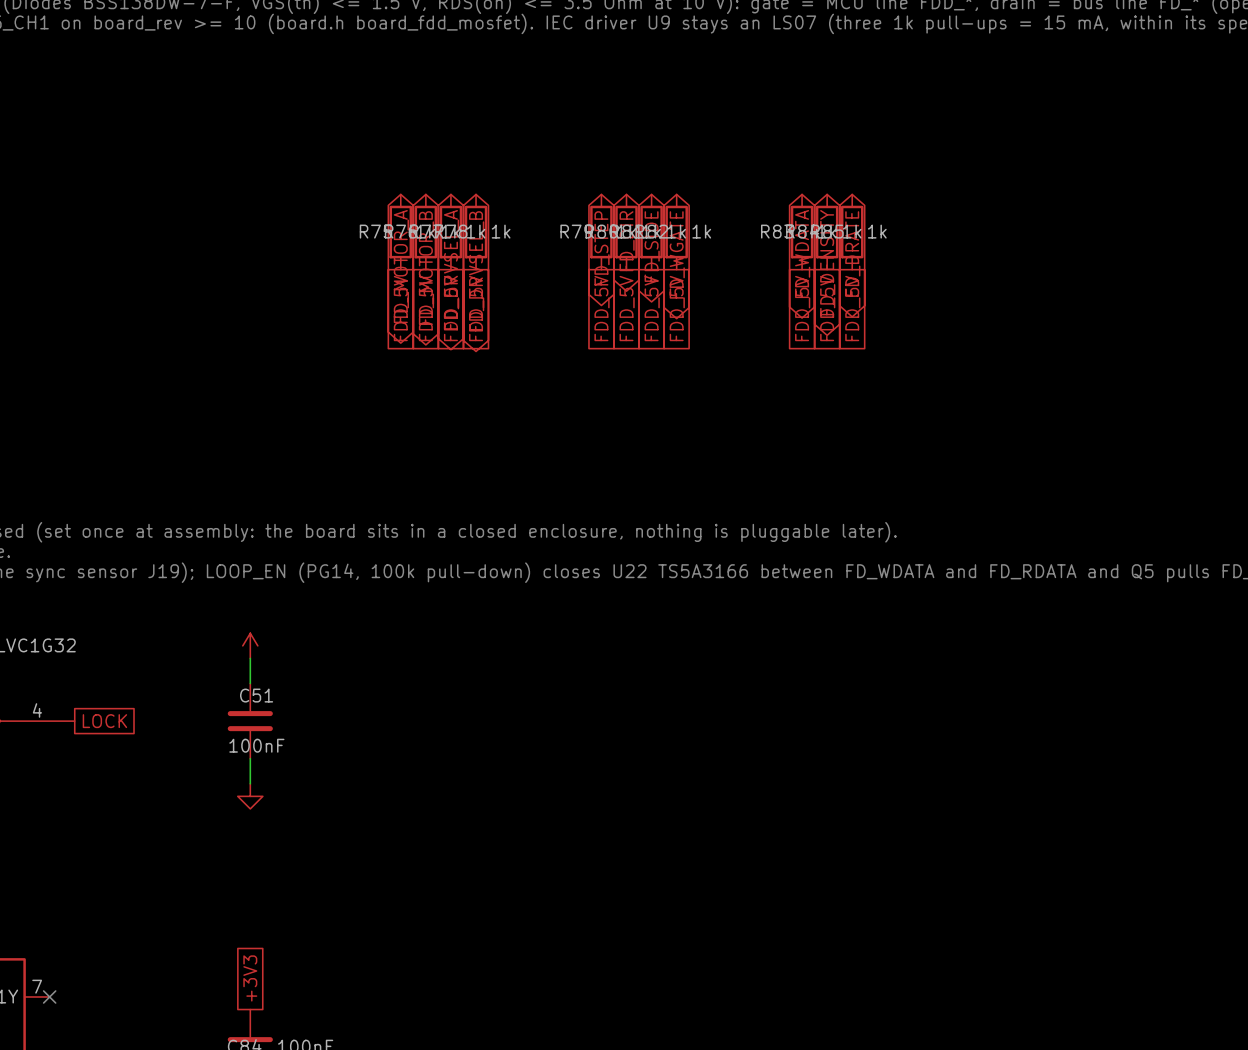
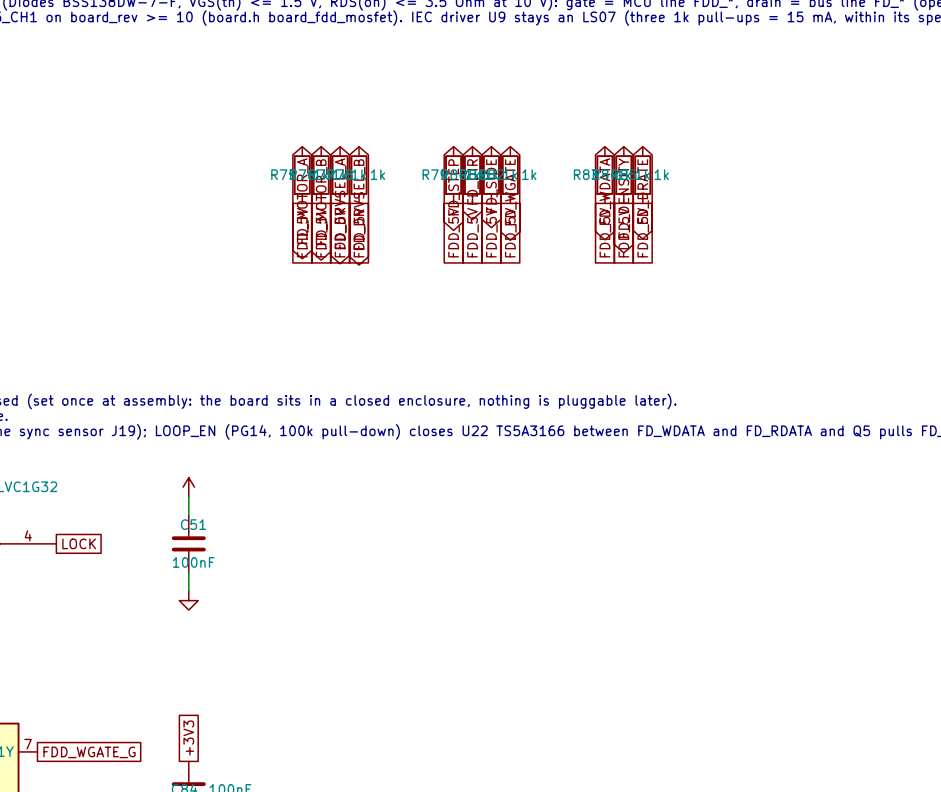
no-connect mark: (49, 996) -> none
global label: none -> FDD_WGATE_G (89, 752)

